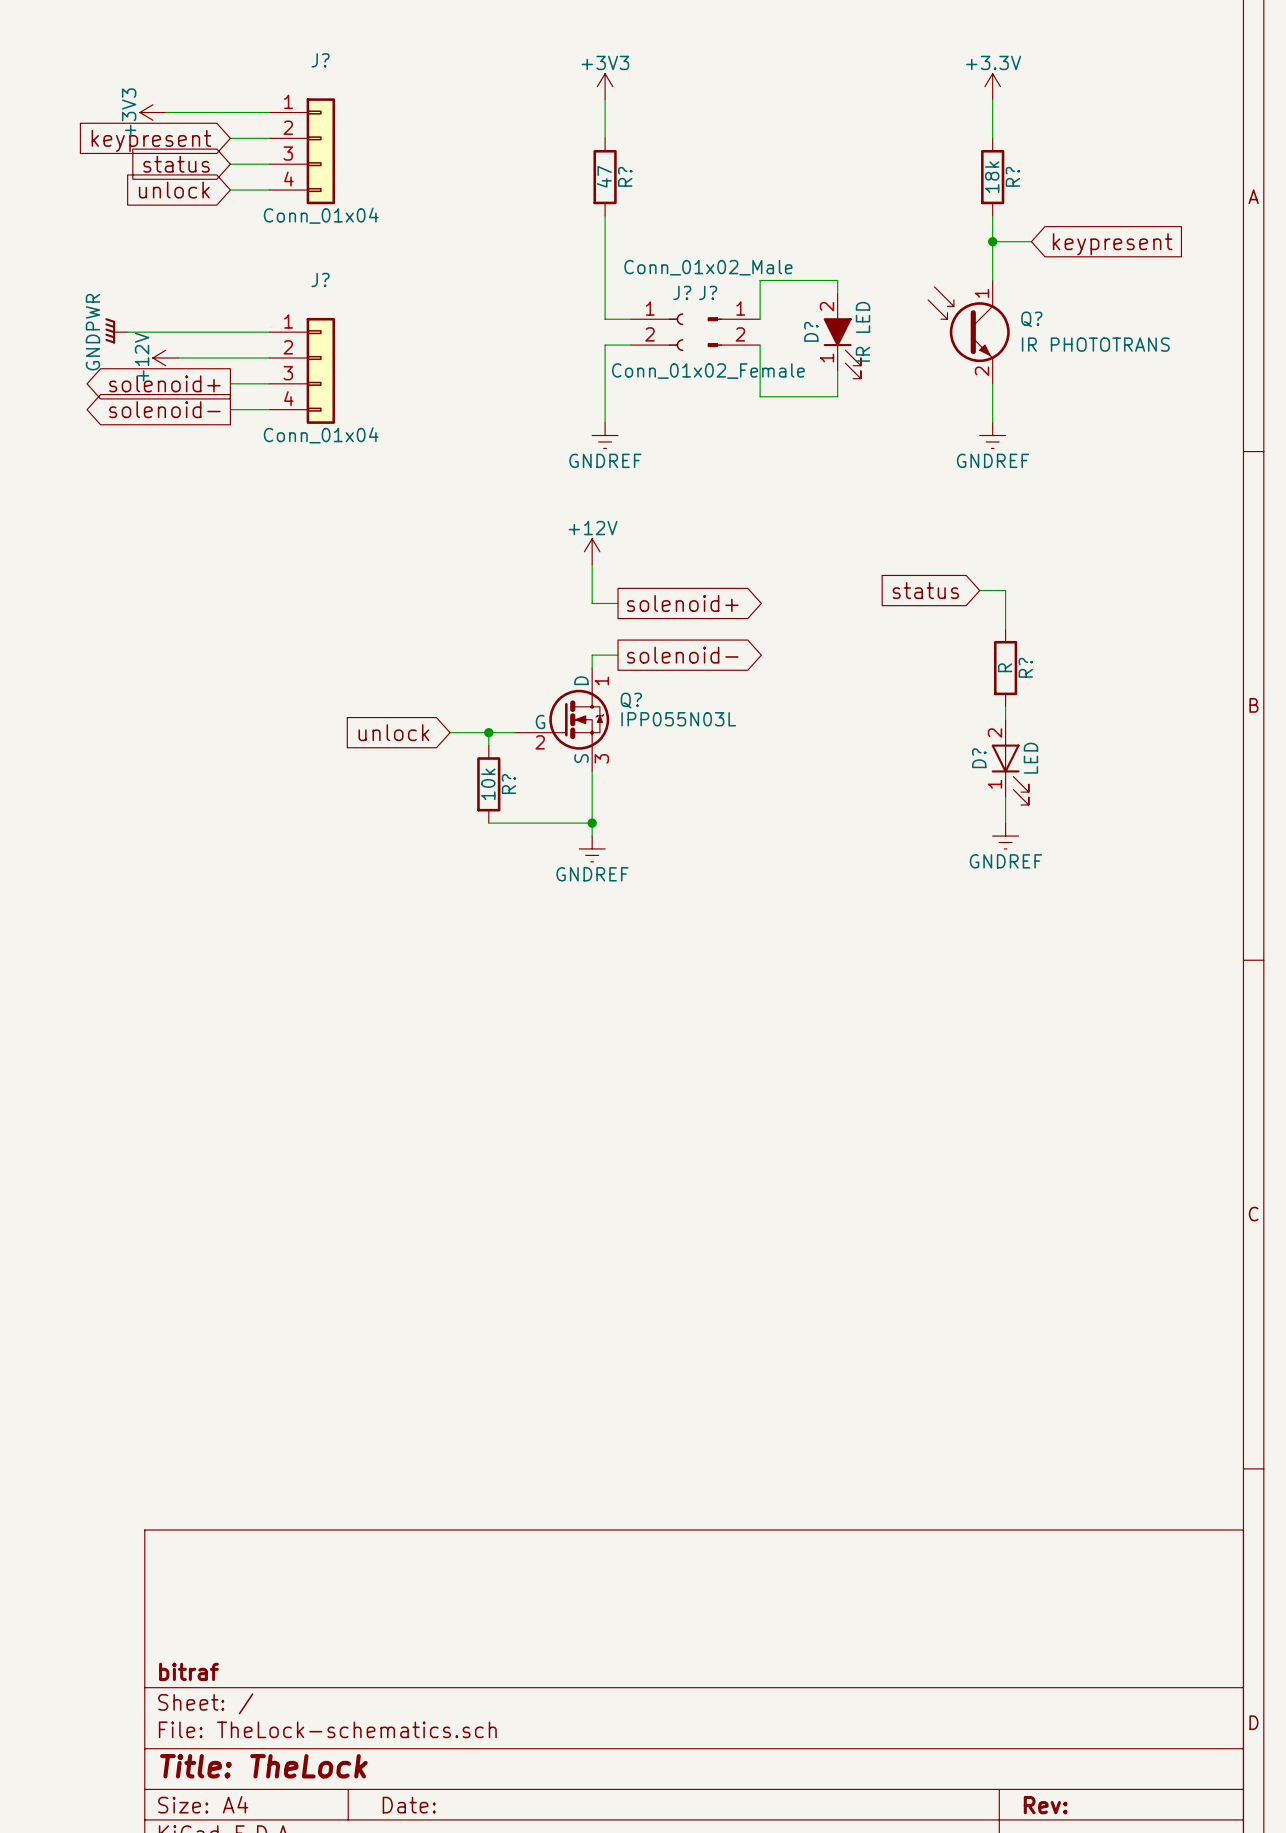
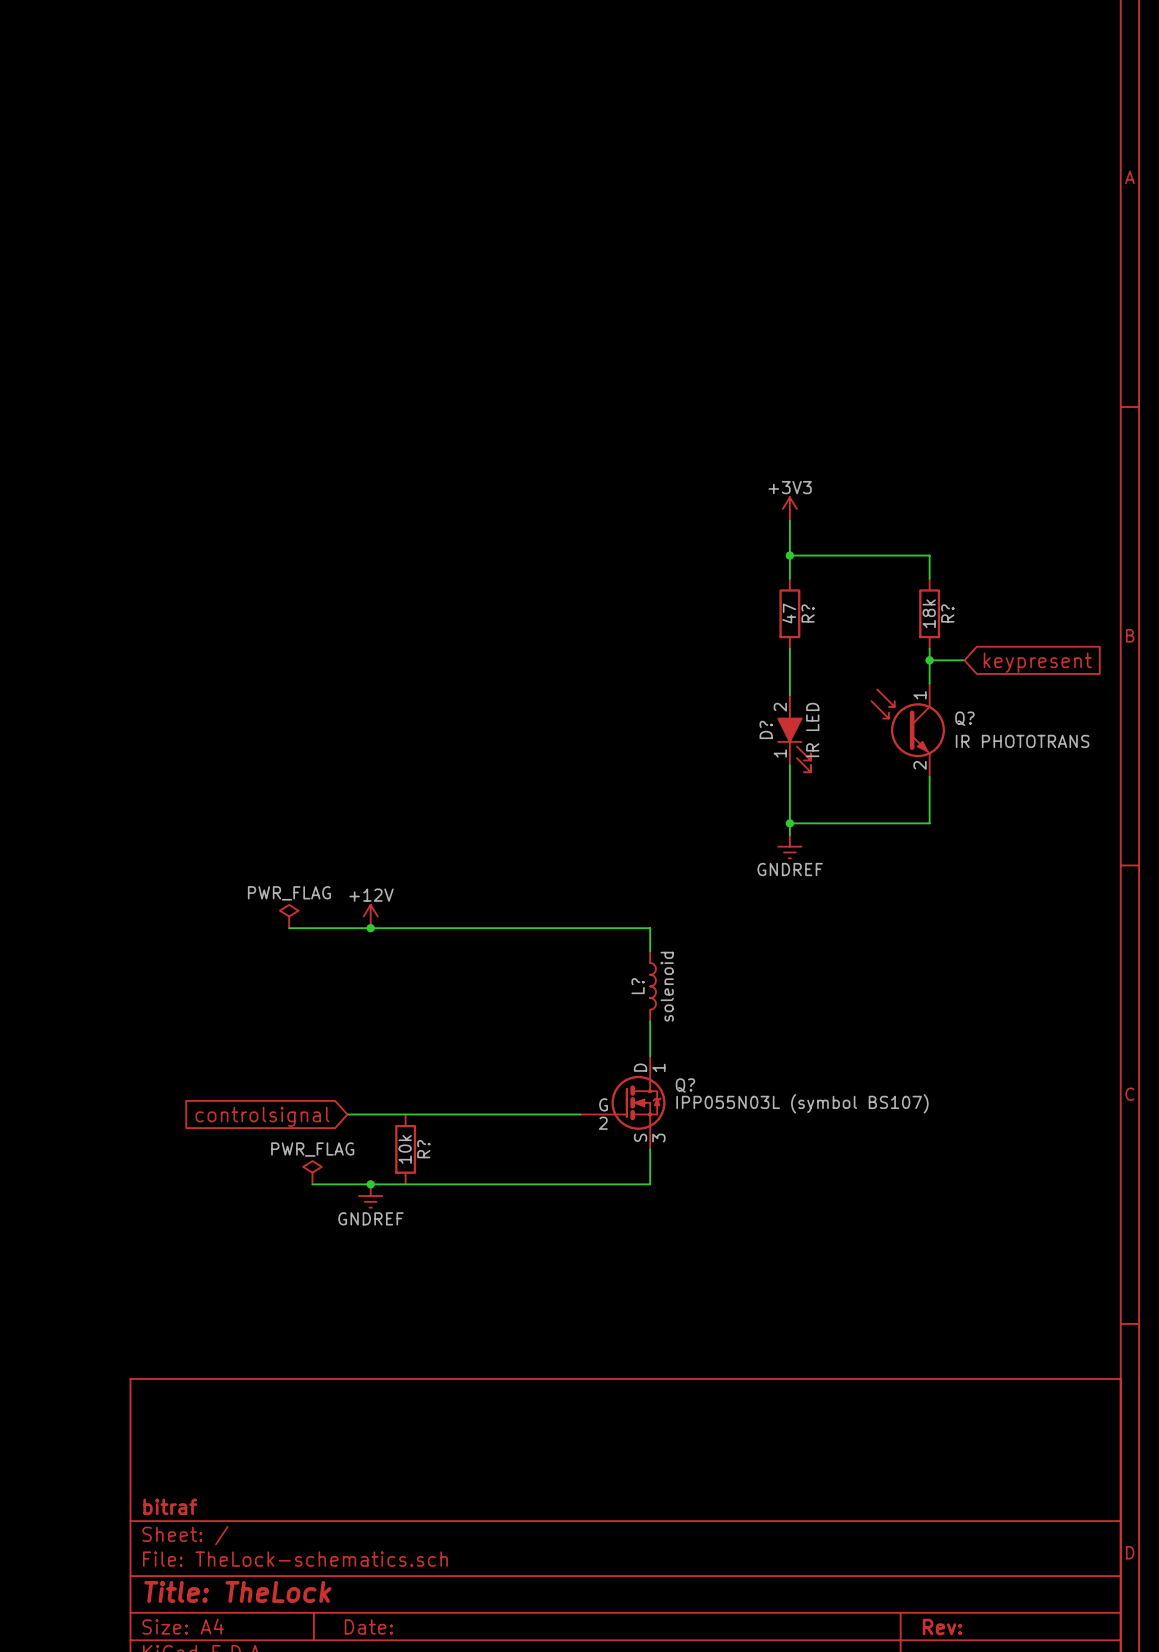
power symbol: +3V3 (605, 86) -> none
power symbol: +3.3V (992, 86) -> none
wire: (605, 99) (605, 138) -> none
wire: (992, 99) (992, 138) -> none
power symbol: +3V3 (152, 112) -> none
wire: (165, 112) (269, 112) -> none
wire: (230, 138) (269, 138) -> none
global label: keypresent (151, 140) -> none
J?: Conn_01x04 (302, 151) -> none
global label: status (176, 164) -> none
wire: (230, 164) (269, 164) -> none
R?: 47 (605, 177) -> none
R?: 18k (992, 177) -> none
global label: unlock (174, 190) -> none
wire: (230, 190) (269, 190) -> none
wire: (605, 215) (605, 319) (630, 319) -> none
wire: (992, 215) (992, 280) -> none
wire: (992, 241) (1031, 241) -> none
junction: (992, 241) -> none
global label: keypresent (1112, 244) -> none
wire: (837, 293) (837, 280) (760, 280) (760, 319) -> none
power symbol: GNDPWR (116, 330) -> none
wire: (127, 332) (269, 332) -> none
J?: Conn_01x02_Female (657, 332) -> none
J?: Conn_01x02_Male (733, 332) -> none
Q?: IR PHOTOTRANS (968, 332) -> none
D?: IR LED (842, 336) -> none
wire: (630, 345) (605, 345) (605, 422) -> none
wire: (760, 345) (760, 396) (837, 396) (837, 370) -> none
power symbol: +12V (165, 357) -> none
wire: (178, 357) (269, 357) -> none
J?: Conn_01x04 (302, 370) -> none
global label: solenoid+ (164, 383) -> none
wire: (230, 383) (269, 383) -> none
wire: (992, 383) (992, 422) -> none
global label: solenoid- (164, 409) -> none
wire: (230, 409) (269, 409) -> none
power symbol: GNDREF (605, 435) -> none
power symbol: GNDREF (992, 435) -> none
power symbol: +12V (592, 551) -> none
wire: (592, 564) (592, 603) (618, 603) -> none
power symbol: none -> +3V3 (789, 508)
wire: none -> (789, 520) (789, 578)
global label: status (925, 590) -> none
wire: (979, 590) (1005, 590) (1005, 629) -> none
global label: solenoid+ (682, 603) -> none
wire: none -> (789, 555) (929, 555) (929, 578)
junction: none -> (789, 555)
wire: (618, 655) (592, 655) (592, 668) -> none
global label: solenoid- (682, 655) -> none
R?: R (1005, 668) -> none
R?: none -> 47 (789, 613)
R?: none -> 18k (929, 613)
wire: (1005, 706) (1005, 719) -> none
Q?: IPP055N03L (561, 719) -> none
wire: none -> (789, 648) (789, 695)
wire: none -> (929, 648) (929, 683)
global label: unlock (393, 732) -> none
wire: (450, 732) (514, 732) -> none
wire: (488, 732) (488, 745) -> none
junction: (488, 732) -> none
wire: none -> (929, 660) (964, 660)
junction: none -> (929, 660)
global label: none -> keypresent (1037, 662)
D?: LED (1010, 762) -> none
wire: (592, 771) (592, 836) -> none
R?: 10k (488, 784) -> none
wire: (1005, 797) (1005, 823) -> none
Q?: none -> IR PHOTOTRANS (908, 730)
D?: none -> IR LED (794, 733)
wire: (488, 823) (592, 823) -> none
junction: (592, 823) -> none
power symbol: GNDREF (1005, 836) -> none
power symbol: GNDREF (592, 848) -> none
wire: none -> (789, 765) (789, 835)
wire: none -> (929, 776) (929, 823) (789, 823)
junction: none -> (789, 823)
power symbol: none -> GNDREF (789, 846)
power symbol: none -> PWR_FLAG (289, 916)
power symbol: none -> +12V (370, 916)
wire: none -> (289, 928) (650, 928) (650, 951)
junction: none -> (370, 928)
L?: none -> solenoid (653, 986)
wire: none -> (650, 1021) (650, 1056)
Q?: none -> IPP055N03L (symbol BS107) (622, 1102)
wire: none -> (347, 1114) (580, 1114)
global label: none -> controlsignal (262, 1116)
R?: none -> 10k (405, 1149)
wire: none -> (650, 1149) (650, 1184) (312, 1184)
power symbol: none -> PWR_FLAG (312, 1172)
junction: none -> (370, 1184)
power symbol: none -> GNDREF (370, 1196)

